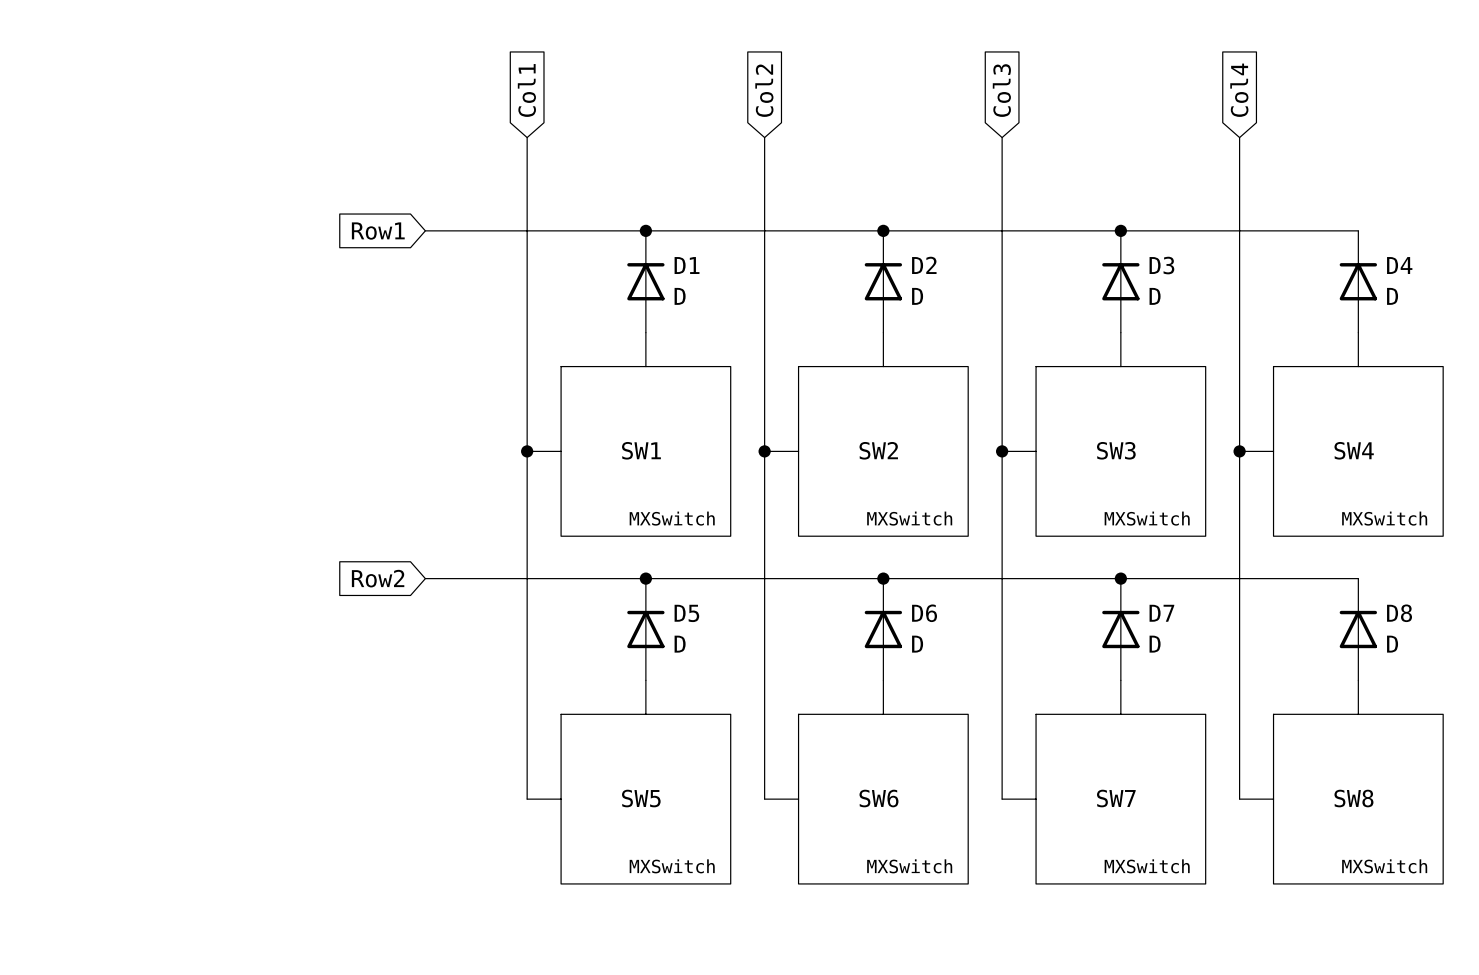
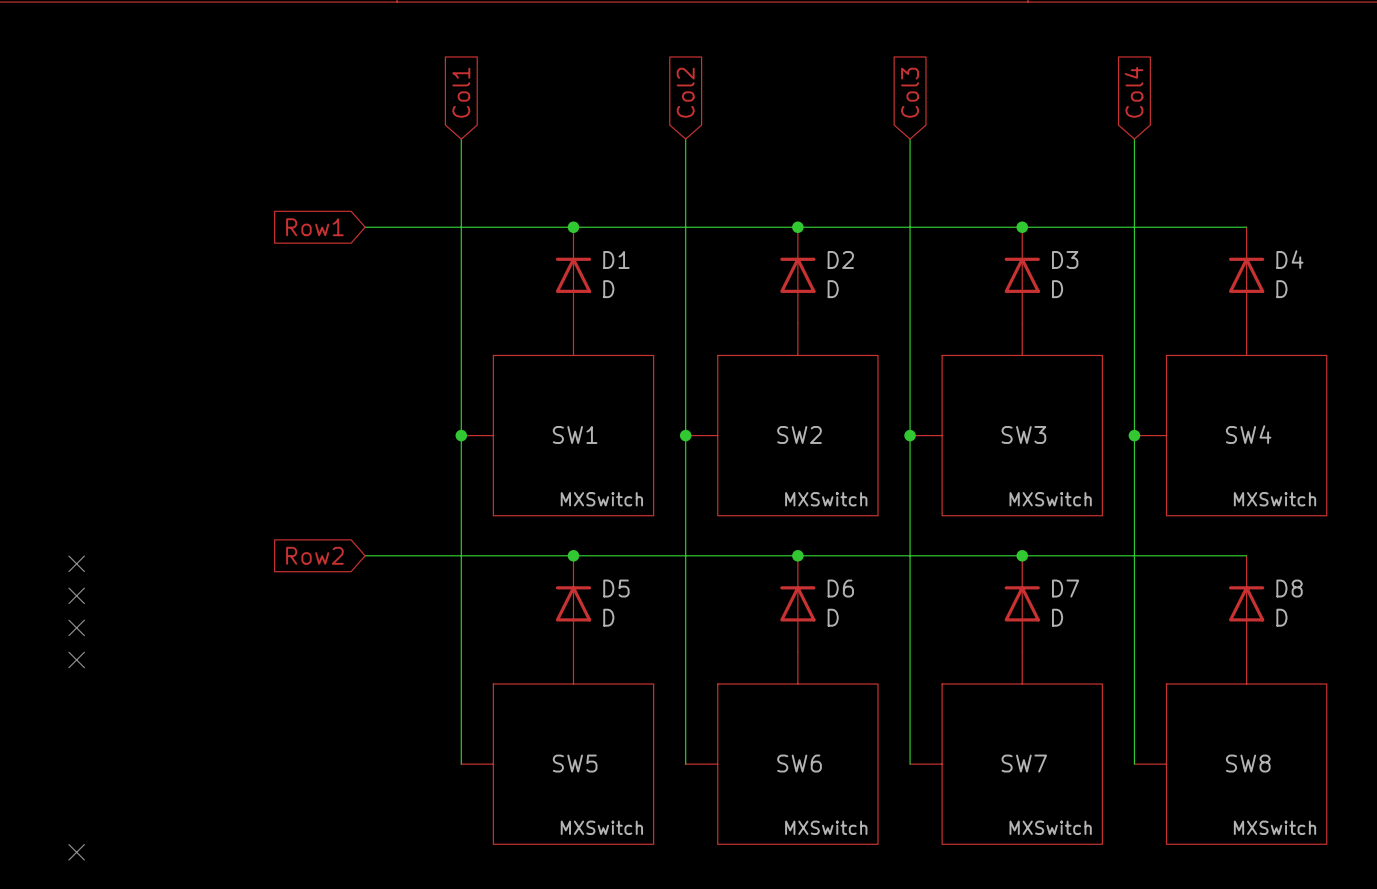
no-connect mark: none -> (76, 563)
no-connect mark: none -> (76, 595)
no-connect mark: none -> (76, 627)
no-connect mark: none -> (76, 659)
no-connect mark: none -> (76, 852)

